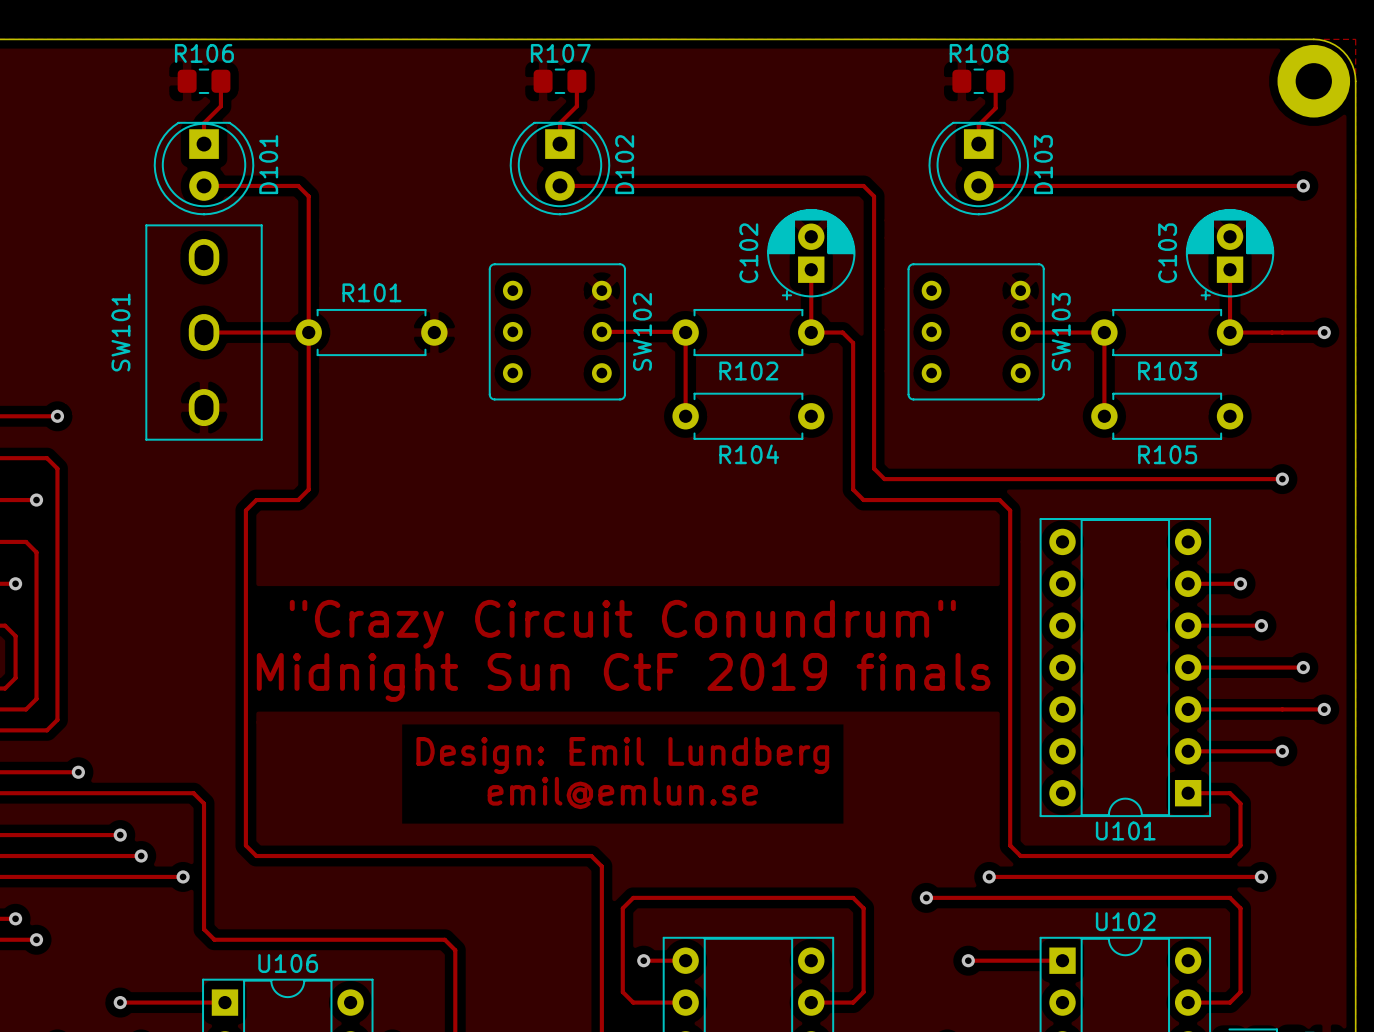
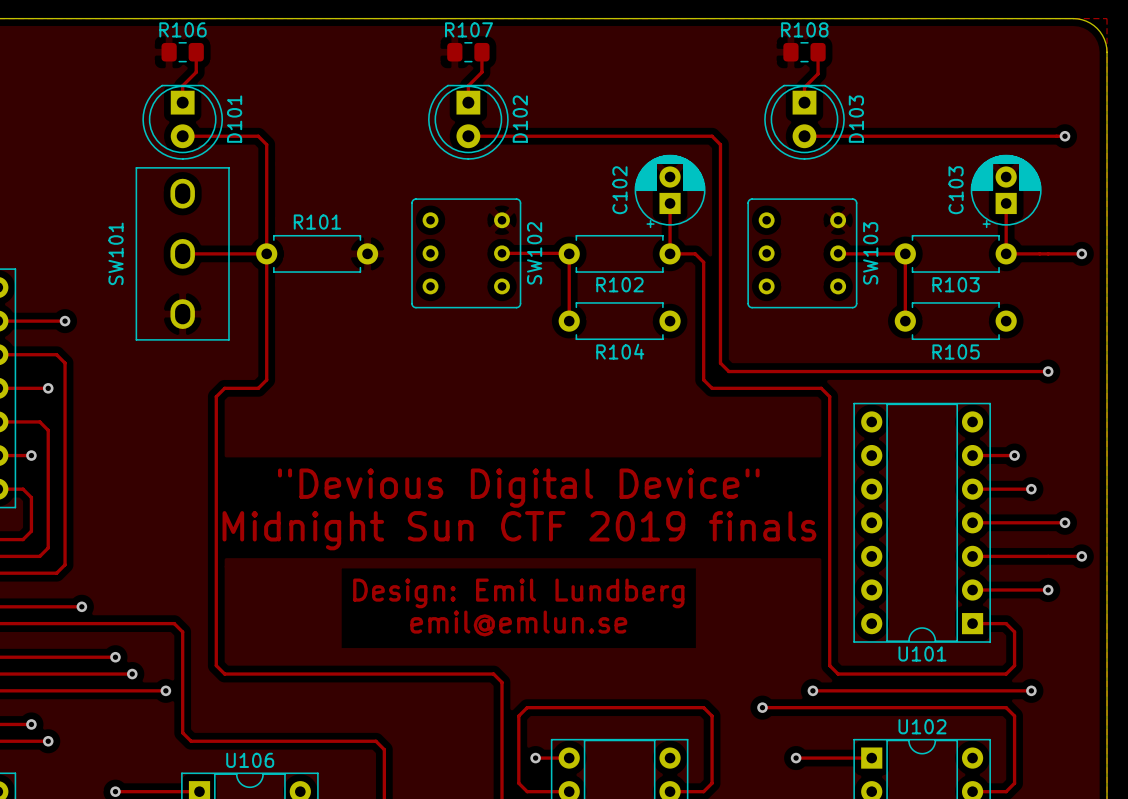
part: (1313, 81) -> none
text: "Crazy Circuit Conundrum" (622, 624) -> "Devious Digital Device" (518, 488)
text: Midnight Sun CtF 2019 finals (623, 677) -> Midnight Sun CTF 2019 finals (519, 530)

